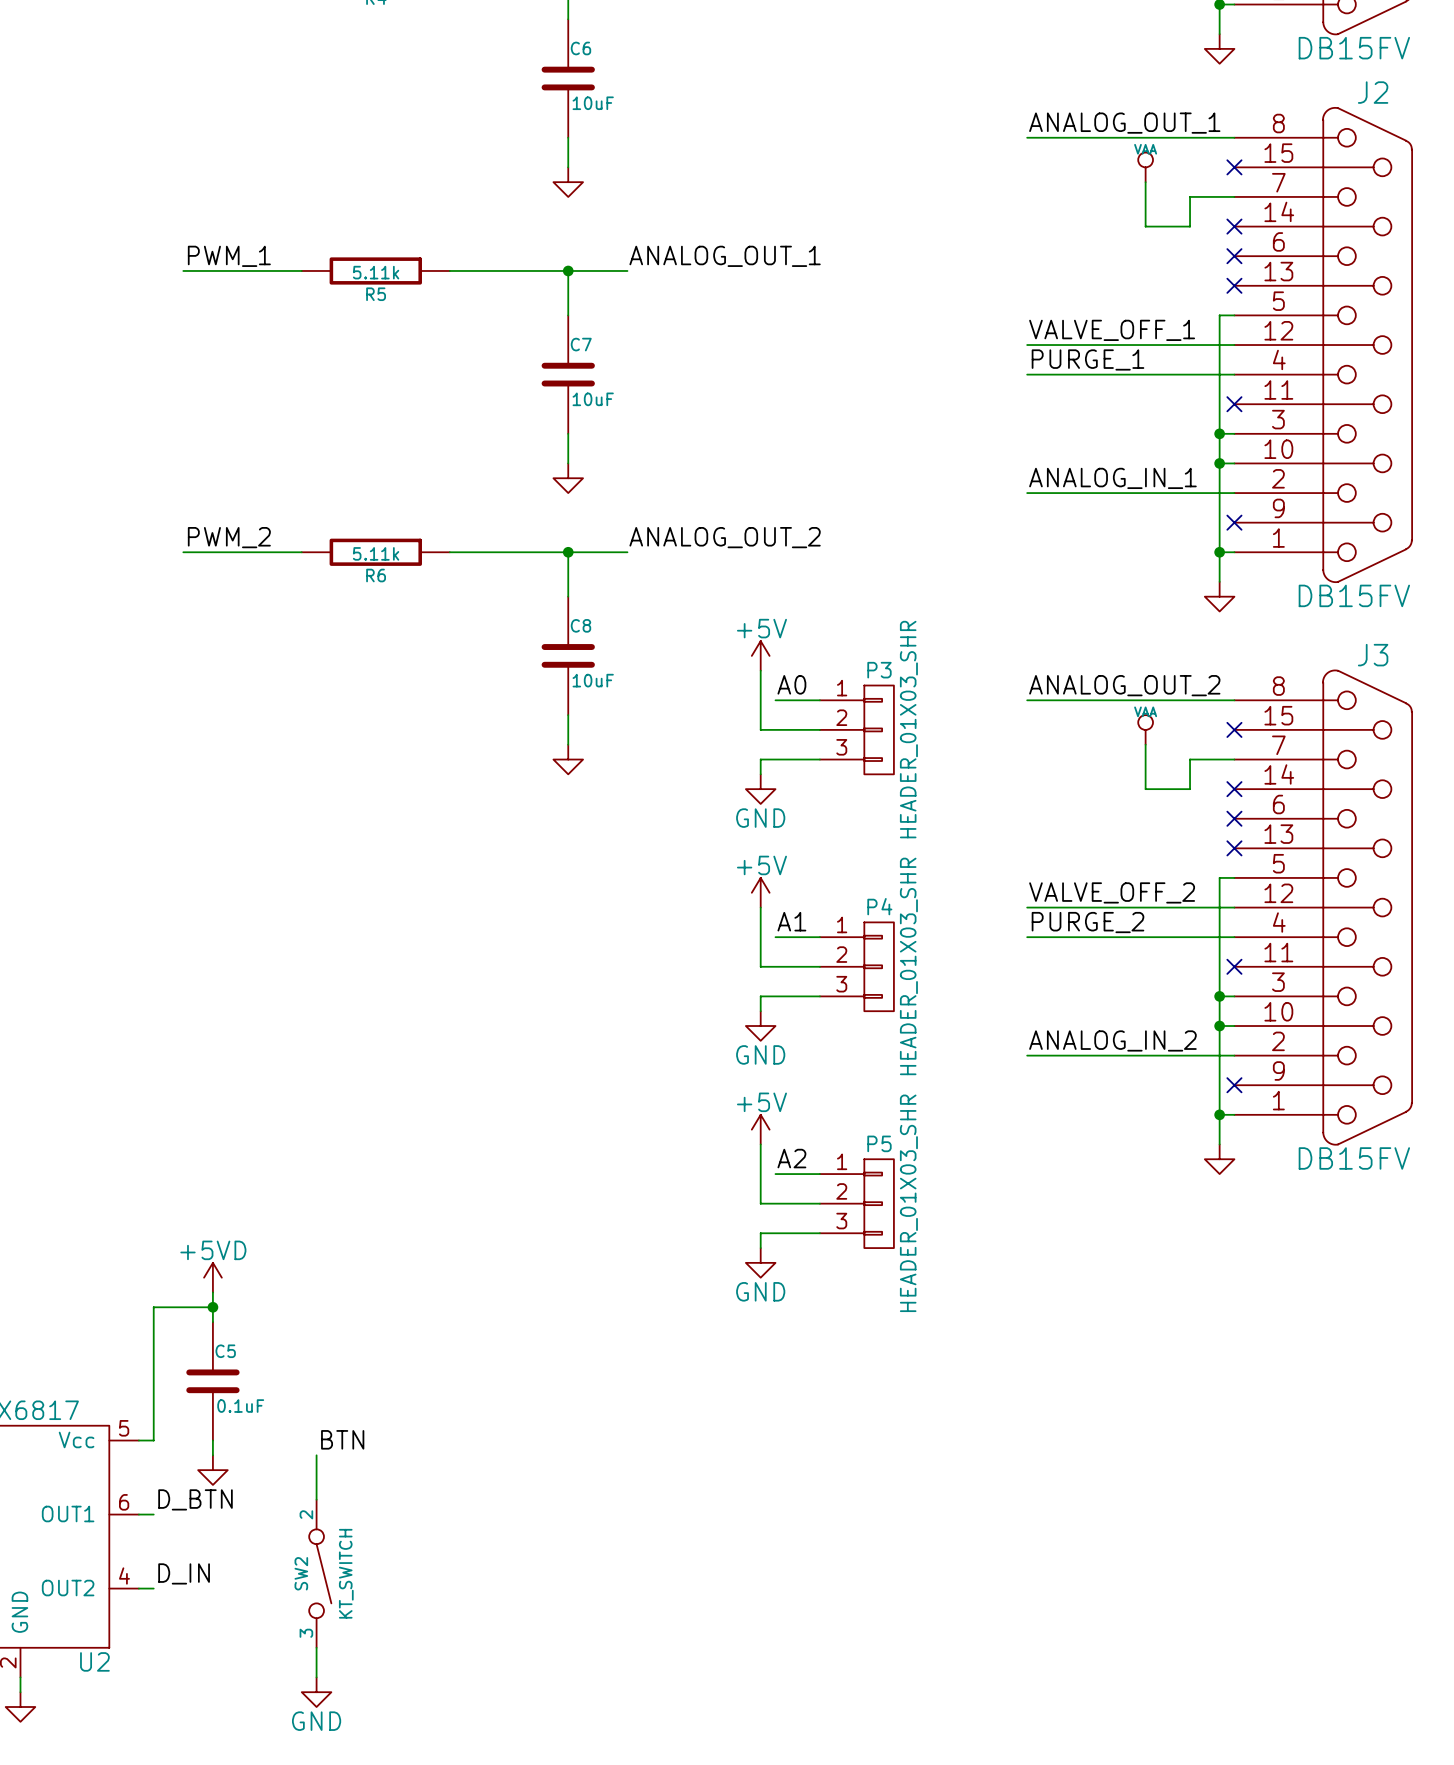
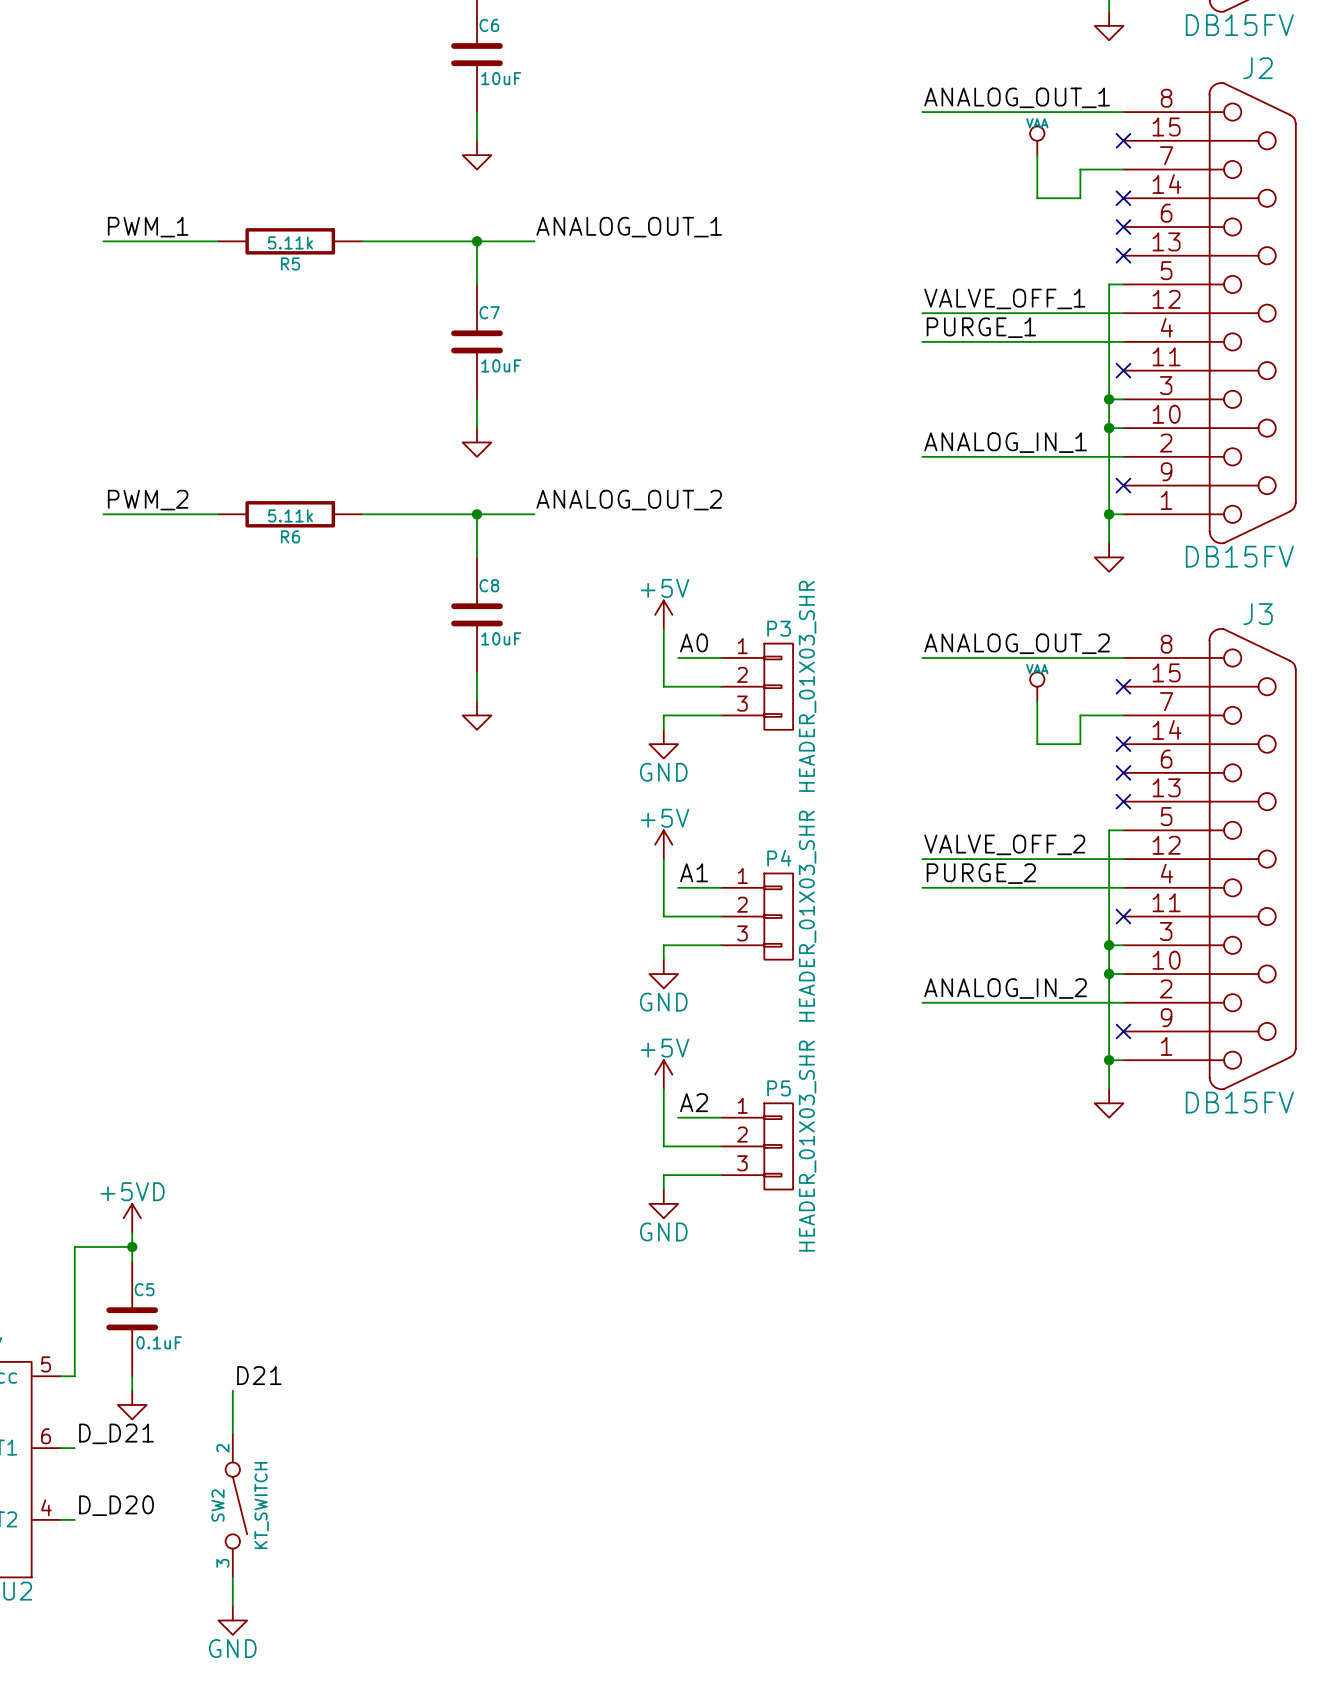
label: BTN (342, 1439) -> D21 (259, 1375)
label: D_BTN (195, 1499) -> D_D21 (116, 1433)
label: D_IN (184, 1573) -> D_D20 (116, 1505)

